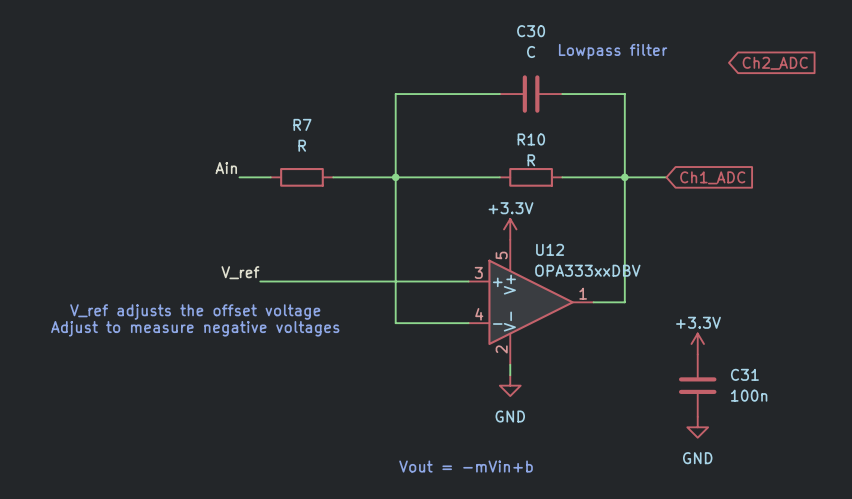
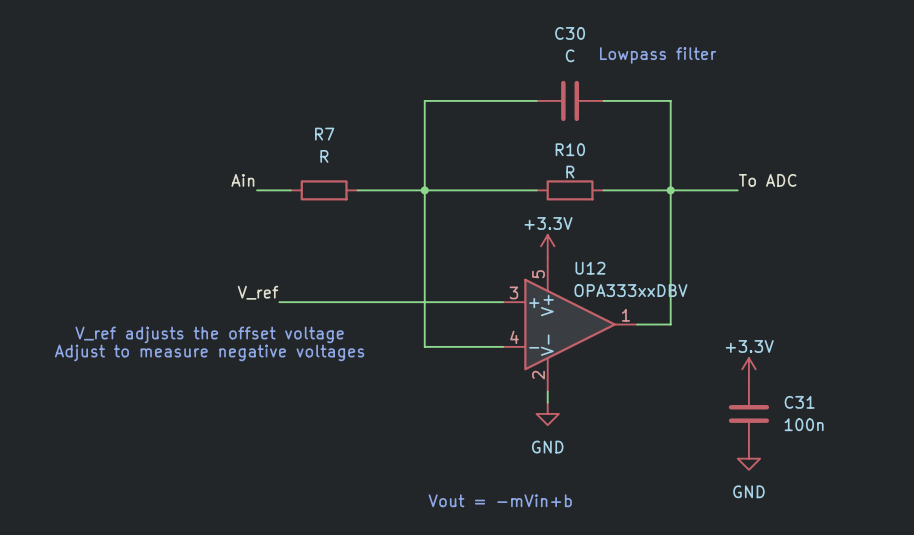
global label: Ch2_ADC (775, 63) -> none
label: none -> To ADC (767, 180)
wire: none -> (715, 190) (737, 190)
global label: Ch1_ADC (712, 177) -> none

